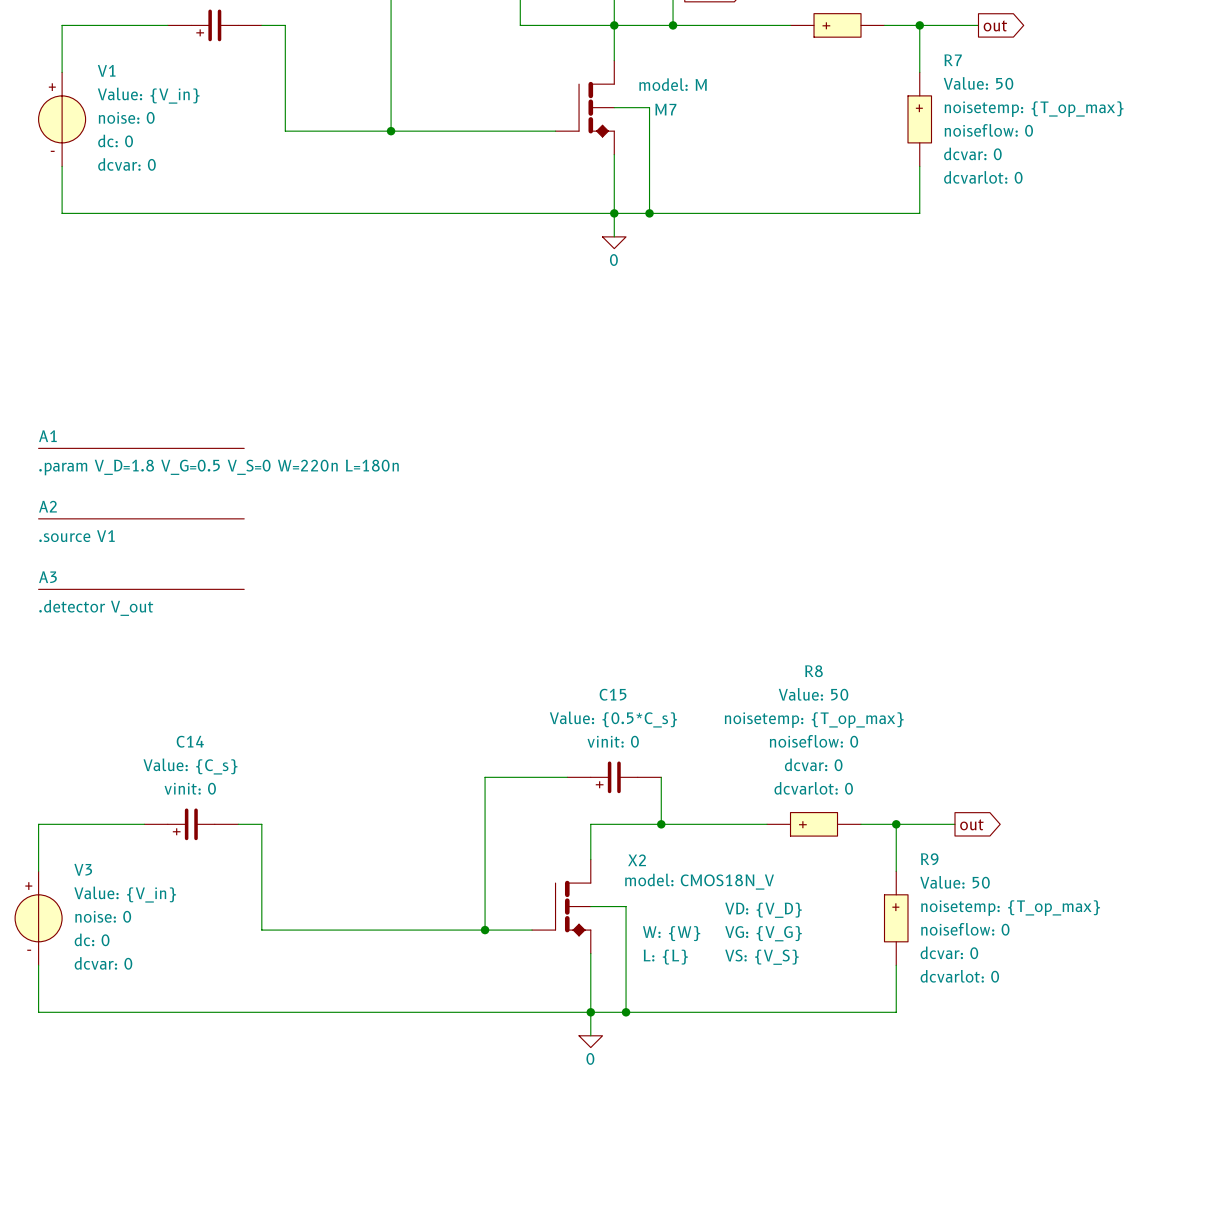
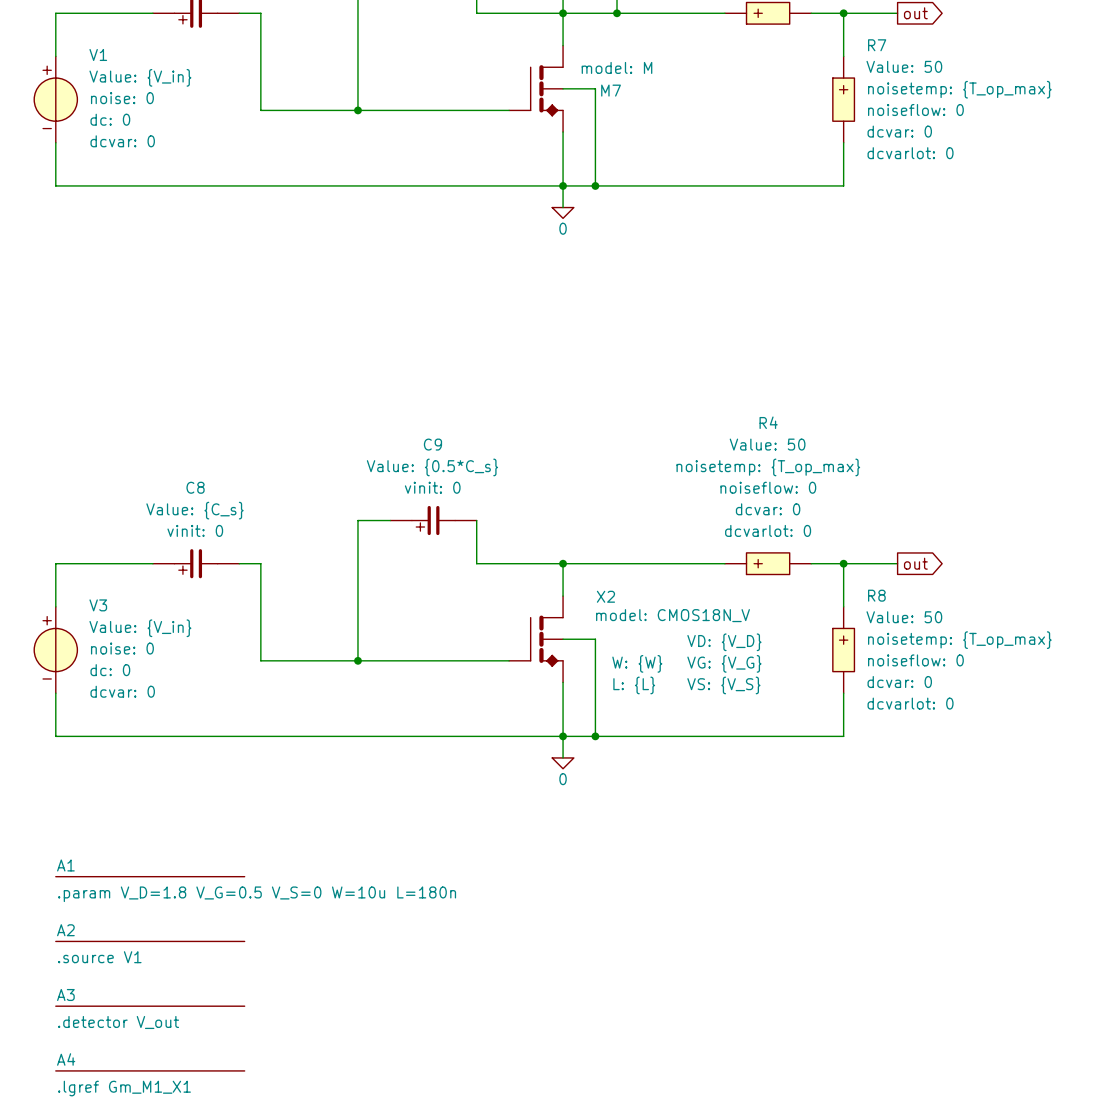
A1 position: (141, 448) -> (150, 876)
A1 text: .param V_D=1.8 V_G=0.5 V_S=0 W=220n L=180n (219, 467) -> .param V_D=1.8 V_G=0.5 V_S=0 W=10u L=180n (257, 894)
A2 position: (141, 518) -> (150, 941)
wire: none -> (390, 520) (357, 520) (357, 660)
C9: none -> Value: {0.5*C_s} (433, 520)
wire: none -> (476, 520) (476, 563) (724, 563)
A3 position: (141, 589) -> (150, 1006)
C8: none -> Value: {C_s} (196, 563)
wire: none -> (563, 563) (563, 596)
junction: none -> (563, 563)
R4: none -> Value: 50 (768, 563)
junction: none -> (843, 563)
R8 name position: R8 (813, 671) -> R8 (876, 595)
R8 value position: Value: 50 (813, 694) -> Value: 50 (904, 617)
R8 text position: noisetemp: {T_op_max} (814, 720) -> noisetemp: {T_op_max} (959, 640)
junction: none -> (357, 660)
R8 text position: dcvar: 0 (813, 764) -> dcvar: 0 (899, 682)
wire: (567, 777) (485, 777) (485, 930) -> none
C15: Value: {0.5*C_s} (614, 777) -> none
wire: (661, 777) (661, 824) -> none
R8 text position: dcvarlot: 0 (813, 788) -> dcvarlot: 0 (910, 703)
junction: none -> (563, 736)
wire: (144, 824) (38, 824) (38, 871) -> (152, 563) (55, 563) (55, 606)
C14: Value: {C_s} (191, 824) -> none
wire: (238, 824) (261, 824) (261, 930) (532, 930) -> (239, 563) (260, 563) (260, 660) (509, 660)
junction position: (661, 824) -> (595, 736)
wire: (767, 824) (590, 824) (590, 859) -> none
R8 rotation: 0° (814, 824) -> 90° clockwise (843, 650)
R8 position: (814, 824) -> (843, 650)
wire: (861, 824) (954, 824) -> (811, 563) (897, 563)
wire: (896, 824) (896, 871) -> (843, 563) (843, 606)
junction: (896, 824) -> none
global label position: out (971, 824) -> out (915, 563)
X2 position: (561, 906) -> (536, 639)
wire: (590, 906) (626, 906) (626, 1012) -> (563, 639) (595, 639) (595, 736)
V3 position: (38, 918) -> (55, 650)
R9: Value: 50 (896, 918) -> none
junction: (485, 930) -> none
wire: (590, 953) (590, 1035) -> (563, 682) (563, 757)
wire: (38, 965) (38, 1012) (896, 1012) (896, 965) -> (55, 693) (55, 736) (843, 736) (843, 693)
junction: (590, 1012) -> none
junction: (626, 1012) -> none
power symbol position: 0 (590, 1041) -> 0 (563, 763)
A4: none -> (150, 1070)

